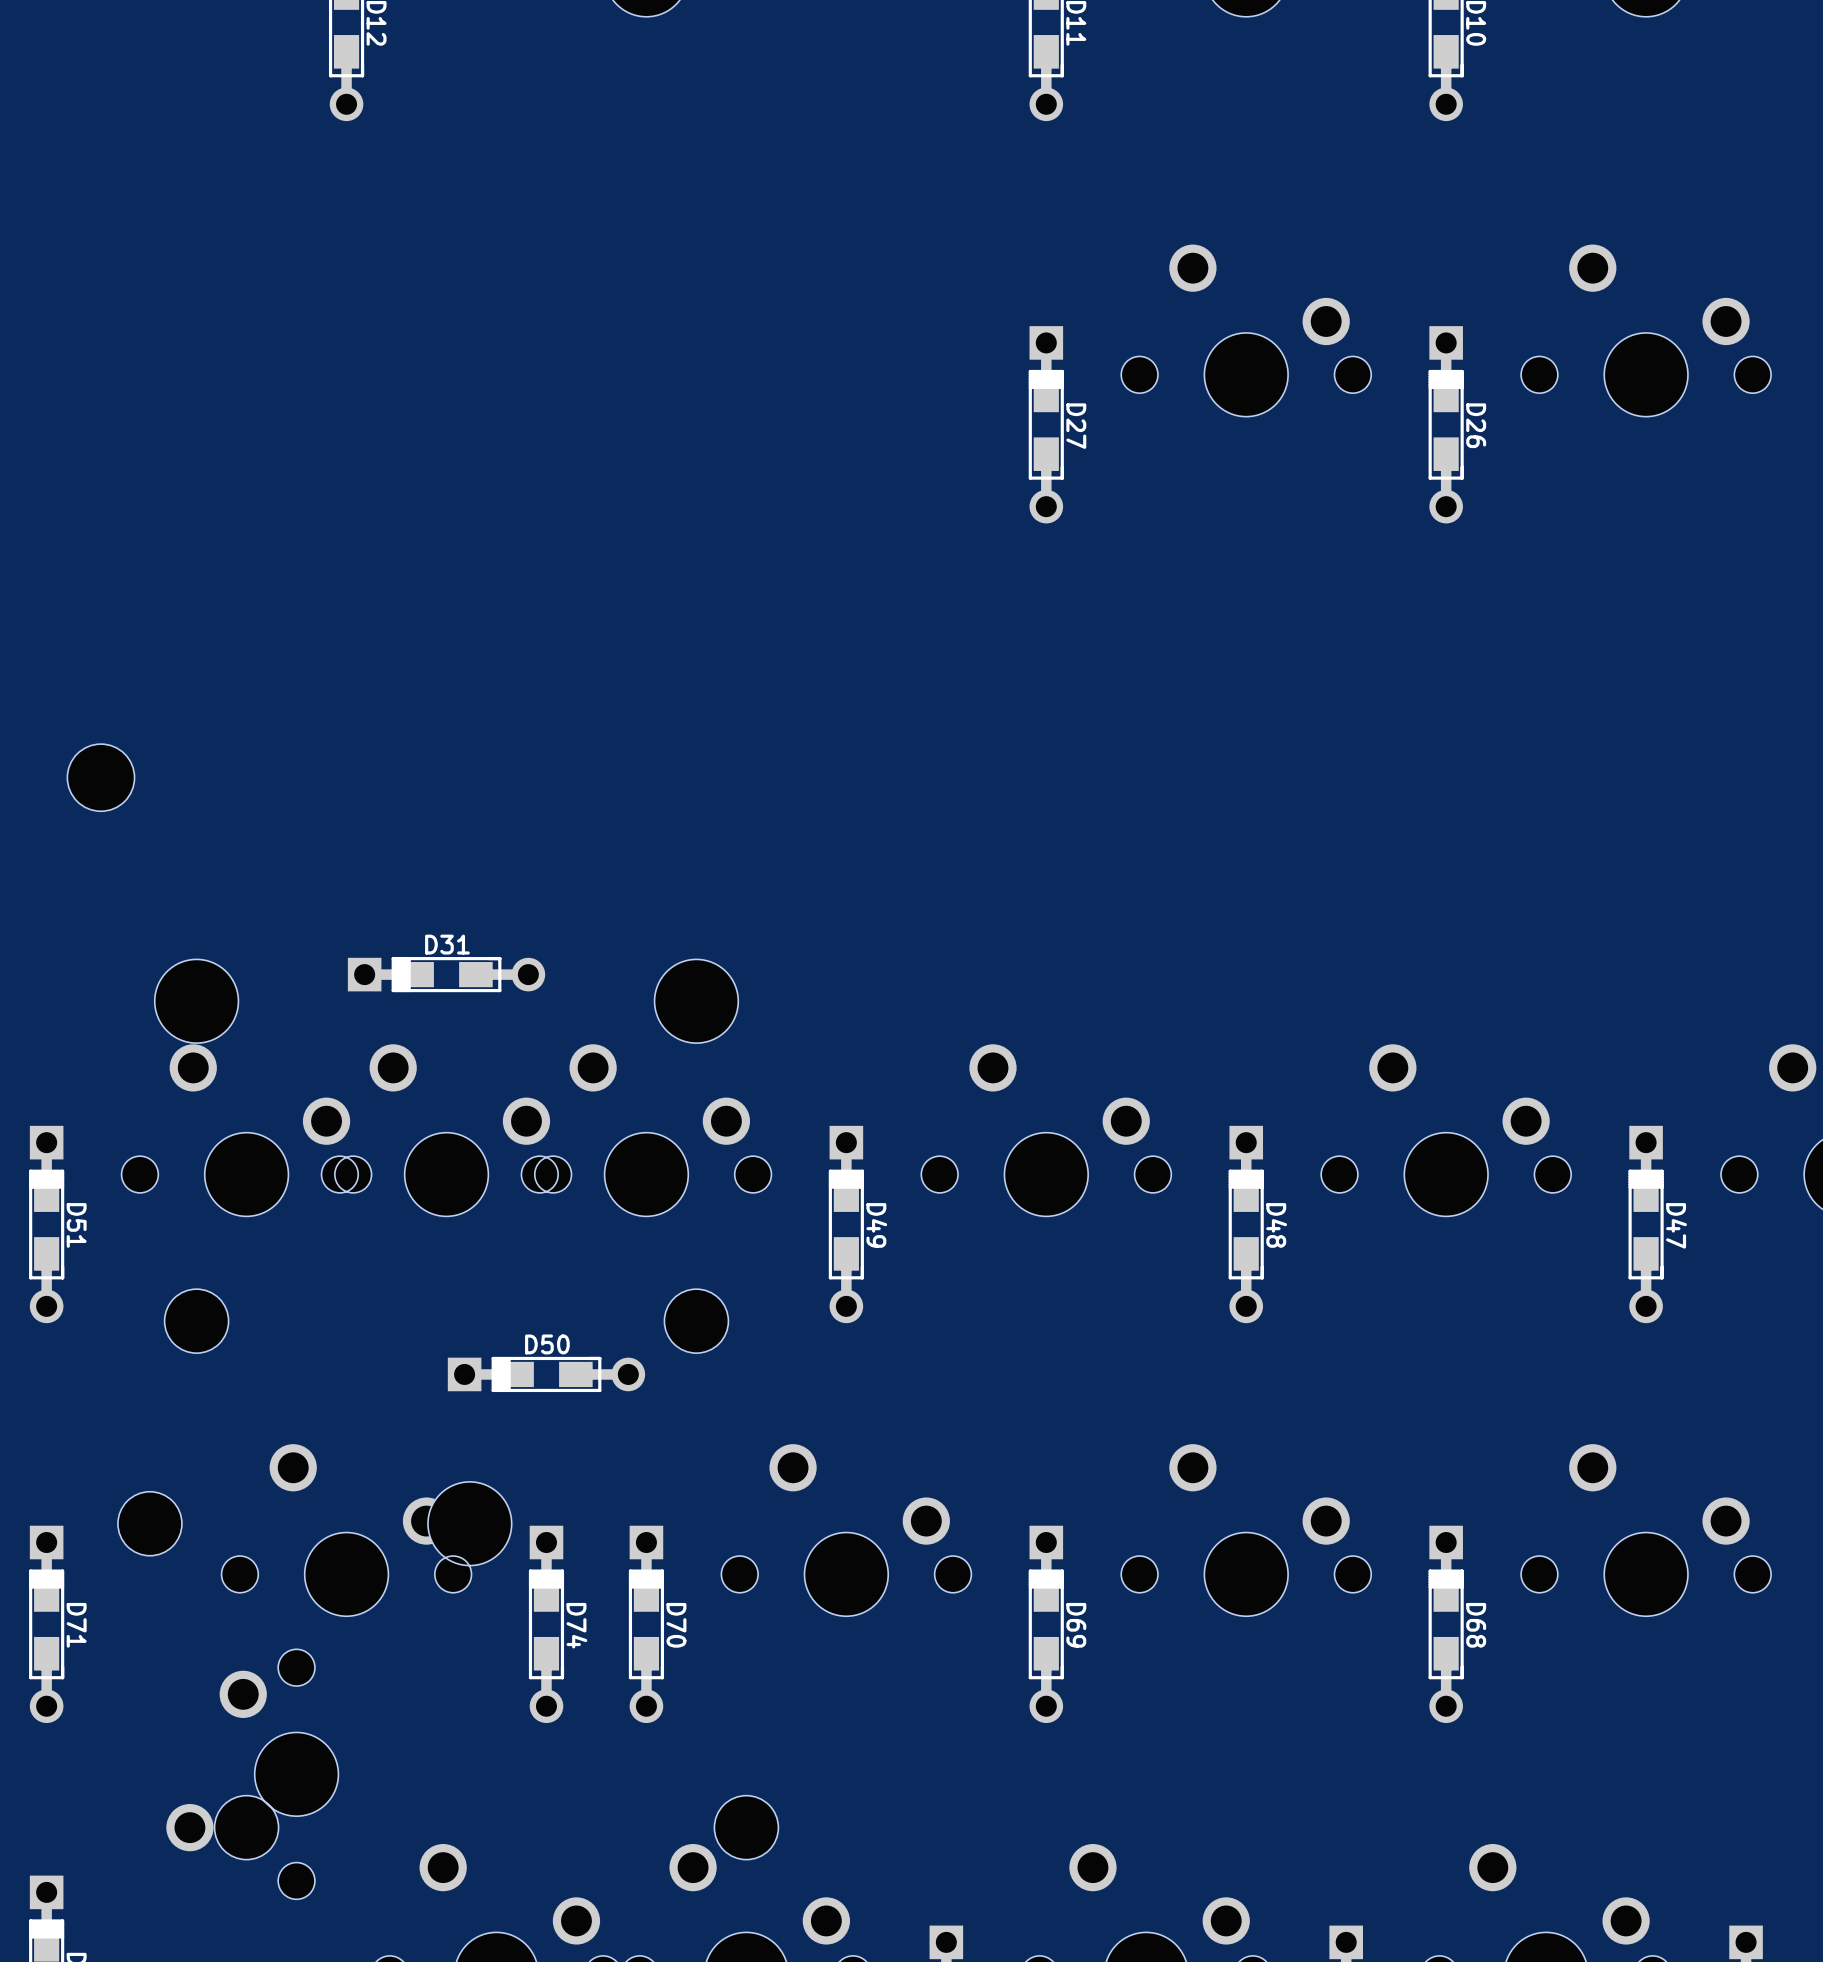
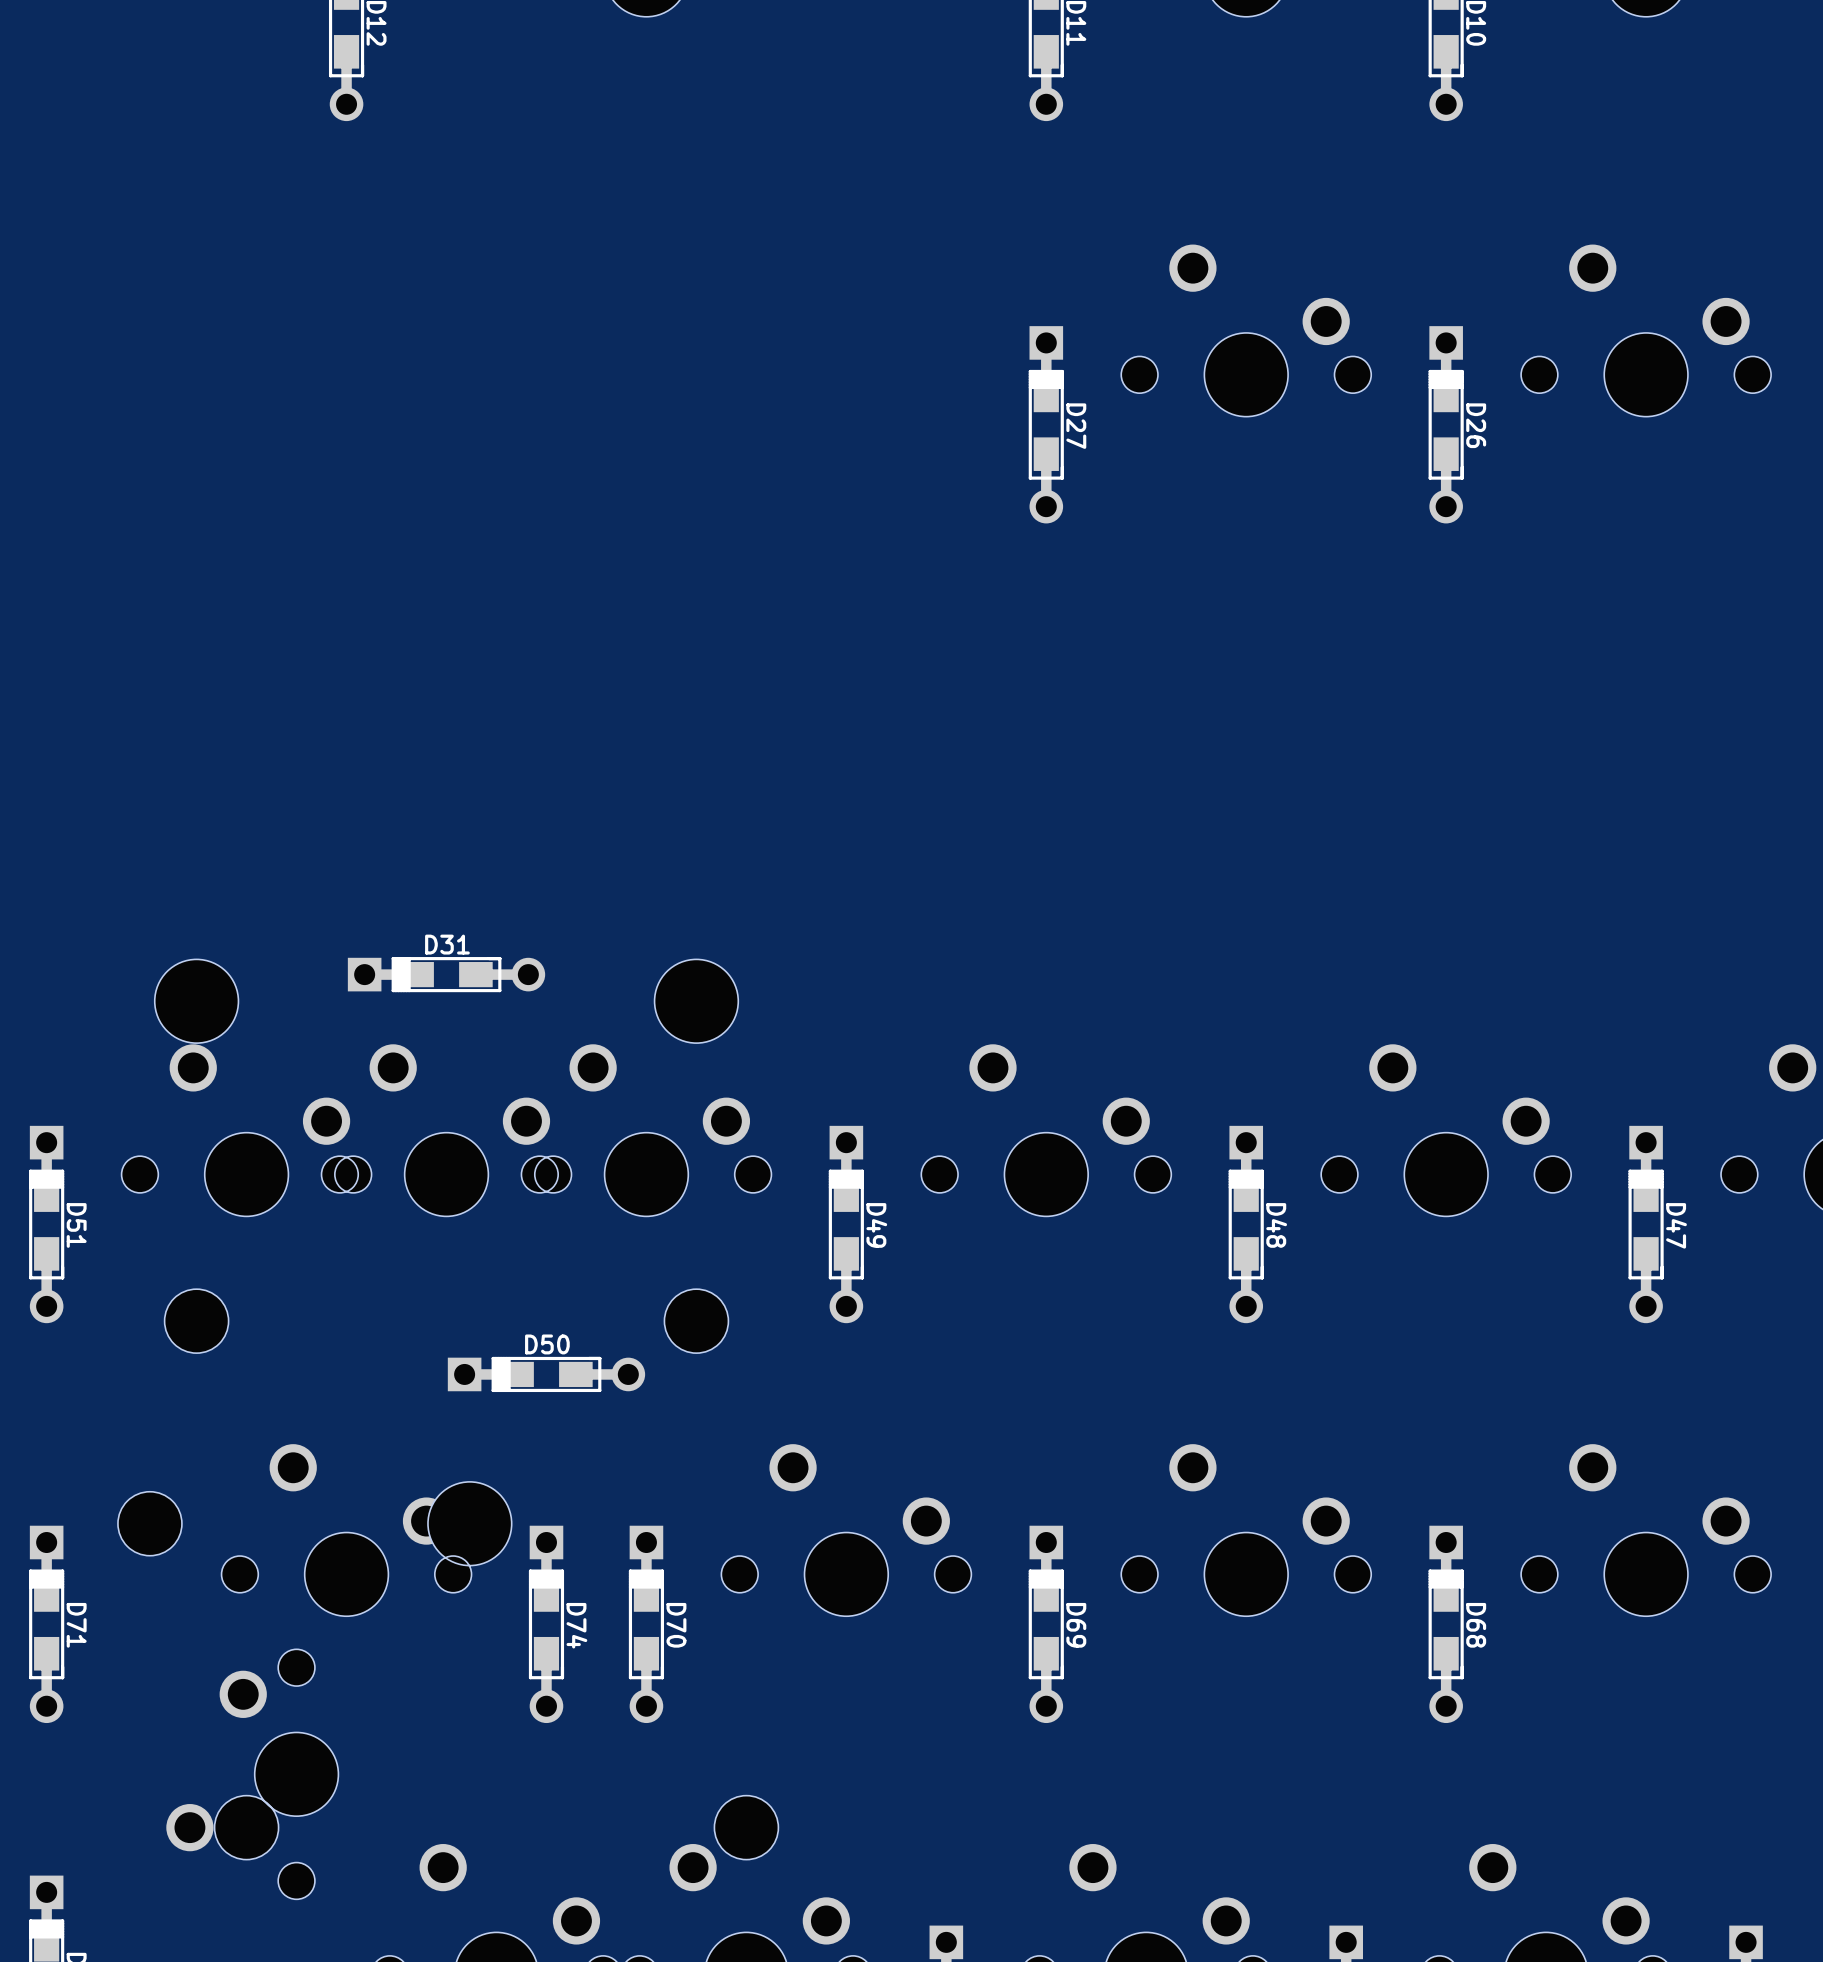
part: (100, 777) -> none

